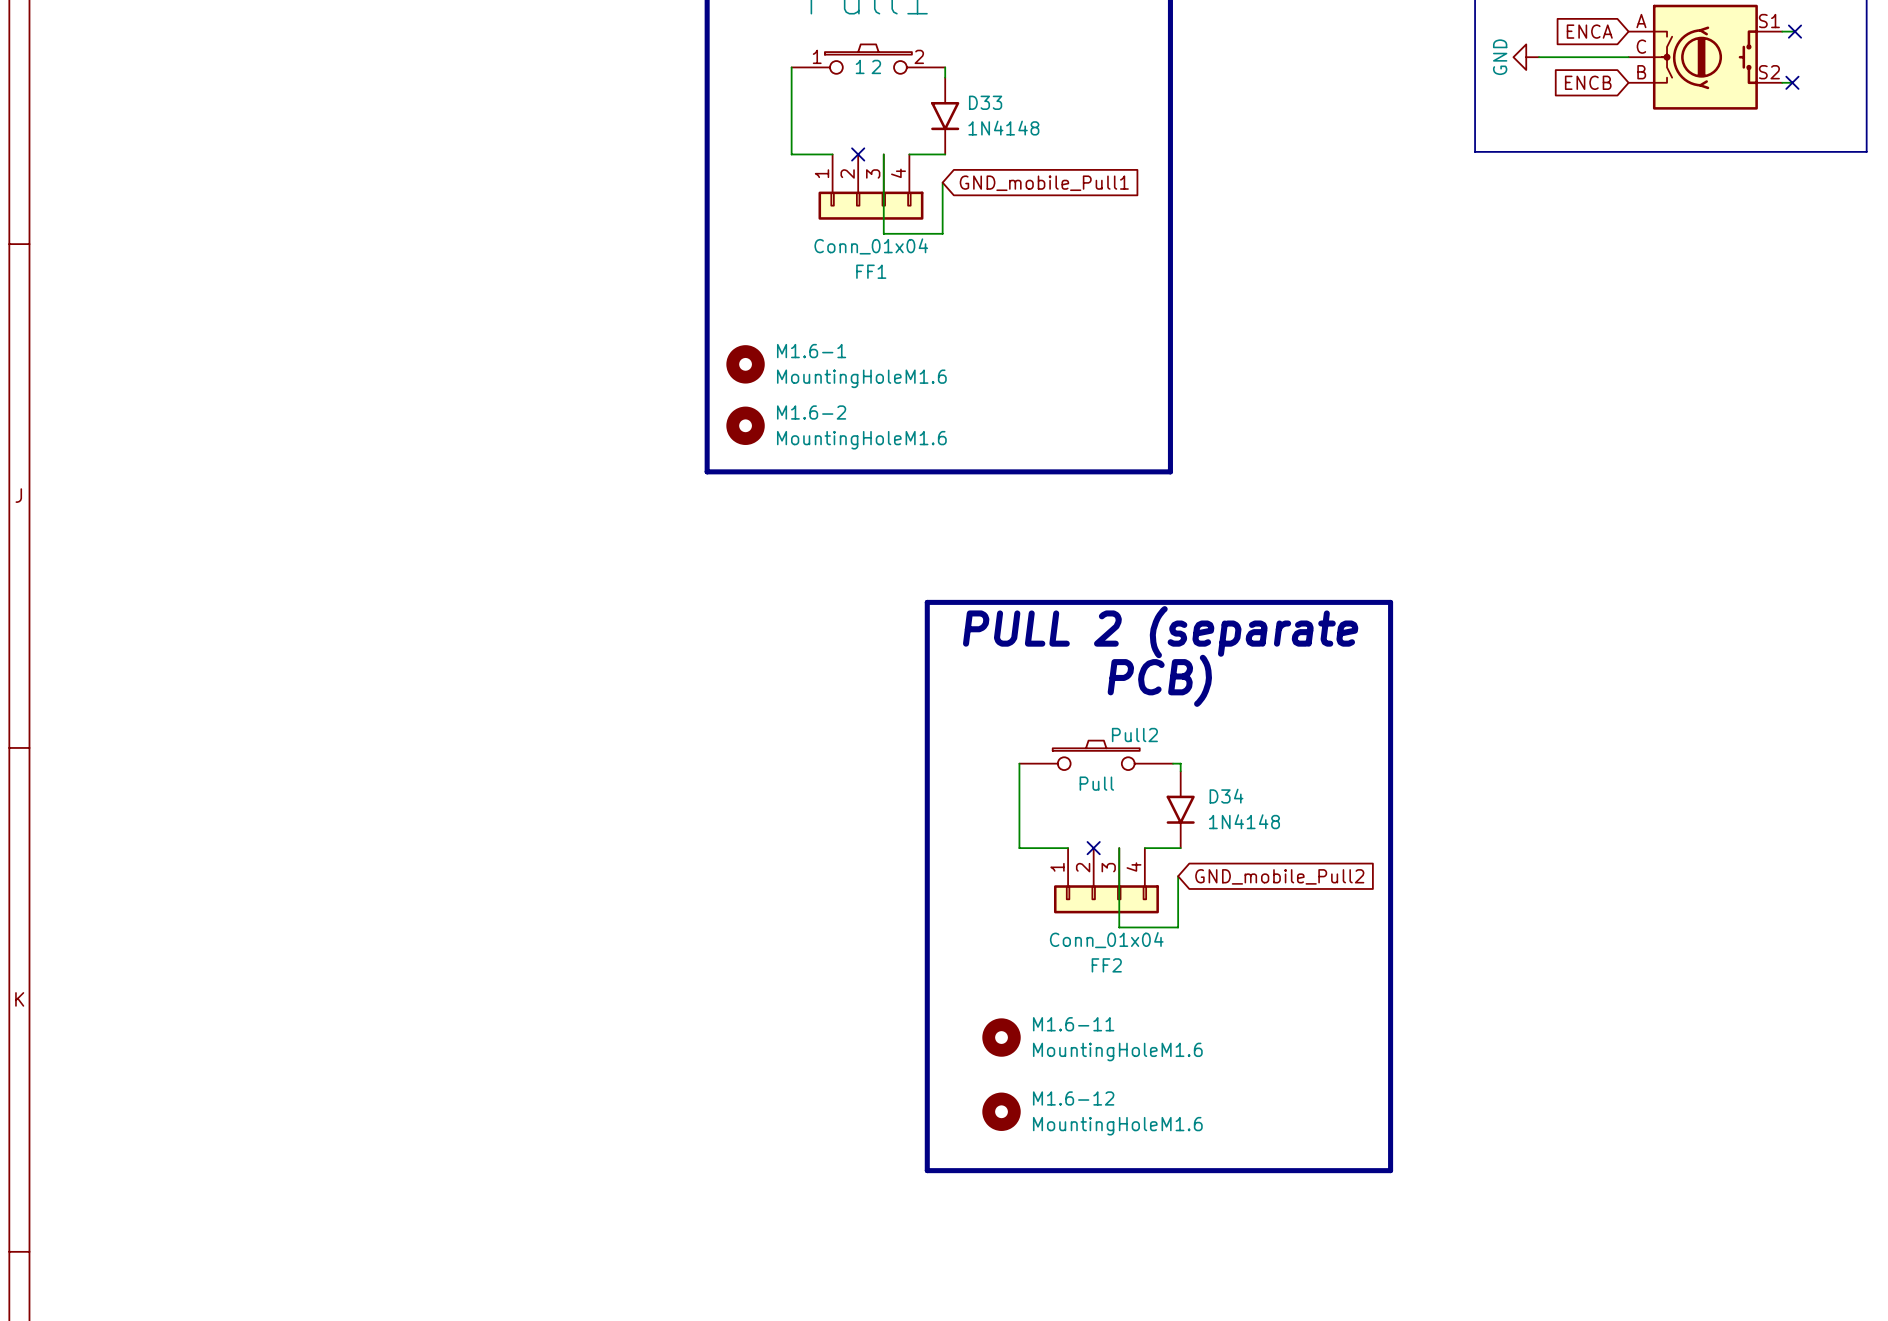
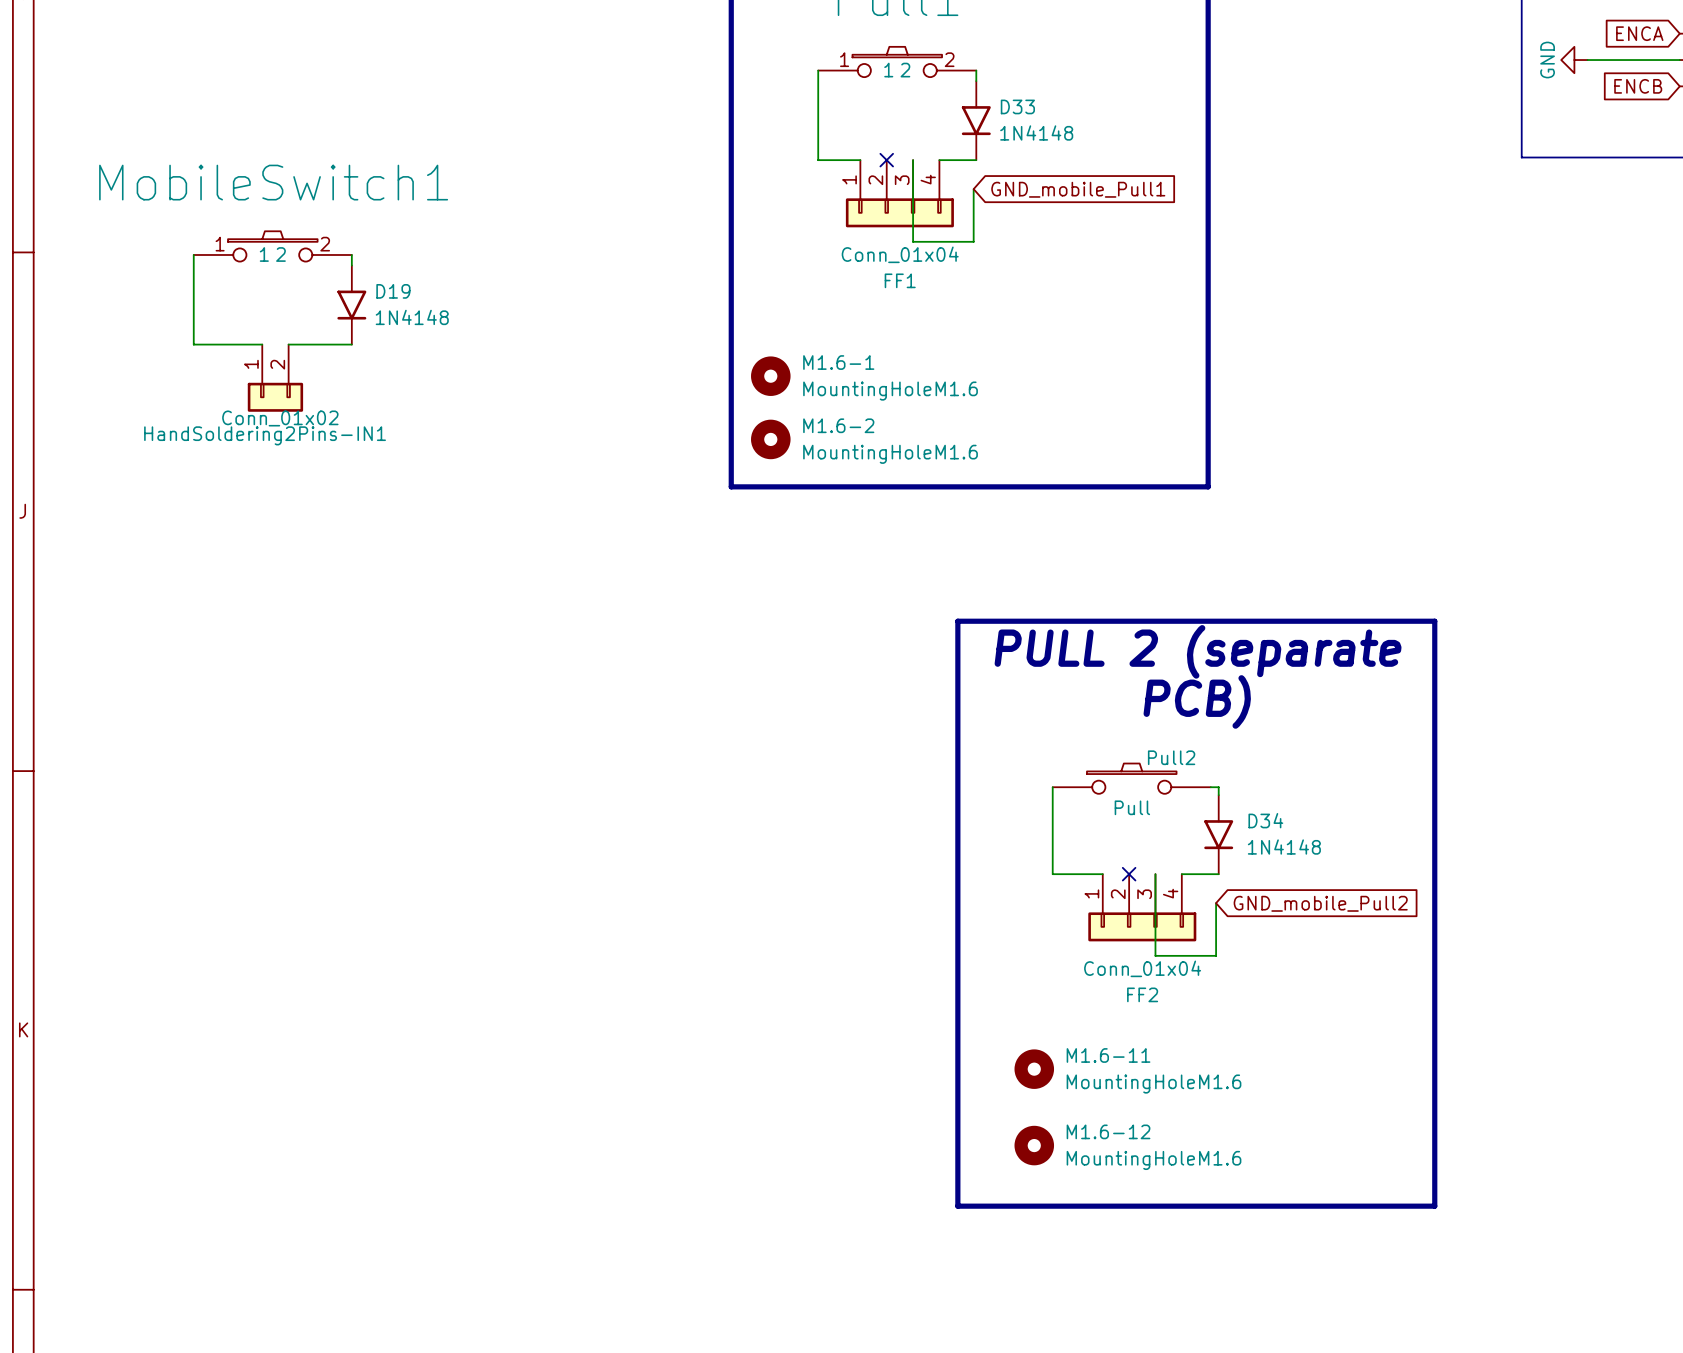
MobileSwitch1: none -> (272, 246)
wire: none -> (193, 254) (193, 344) (262, 344)
wire: none -> (351, 254) (351, 265)
D19: none -> 1N4148 (351, 305)
wire: none -> (288, 344) (351, 344)
HandSoldering2Pins-IN1: none -> Conn_01x02 (275, 378)

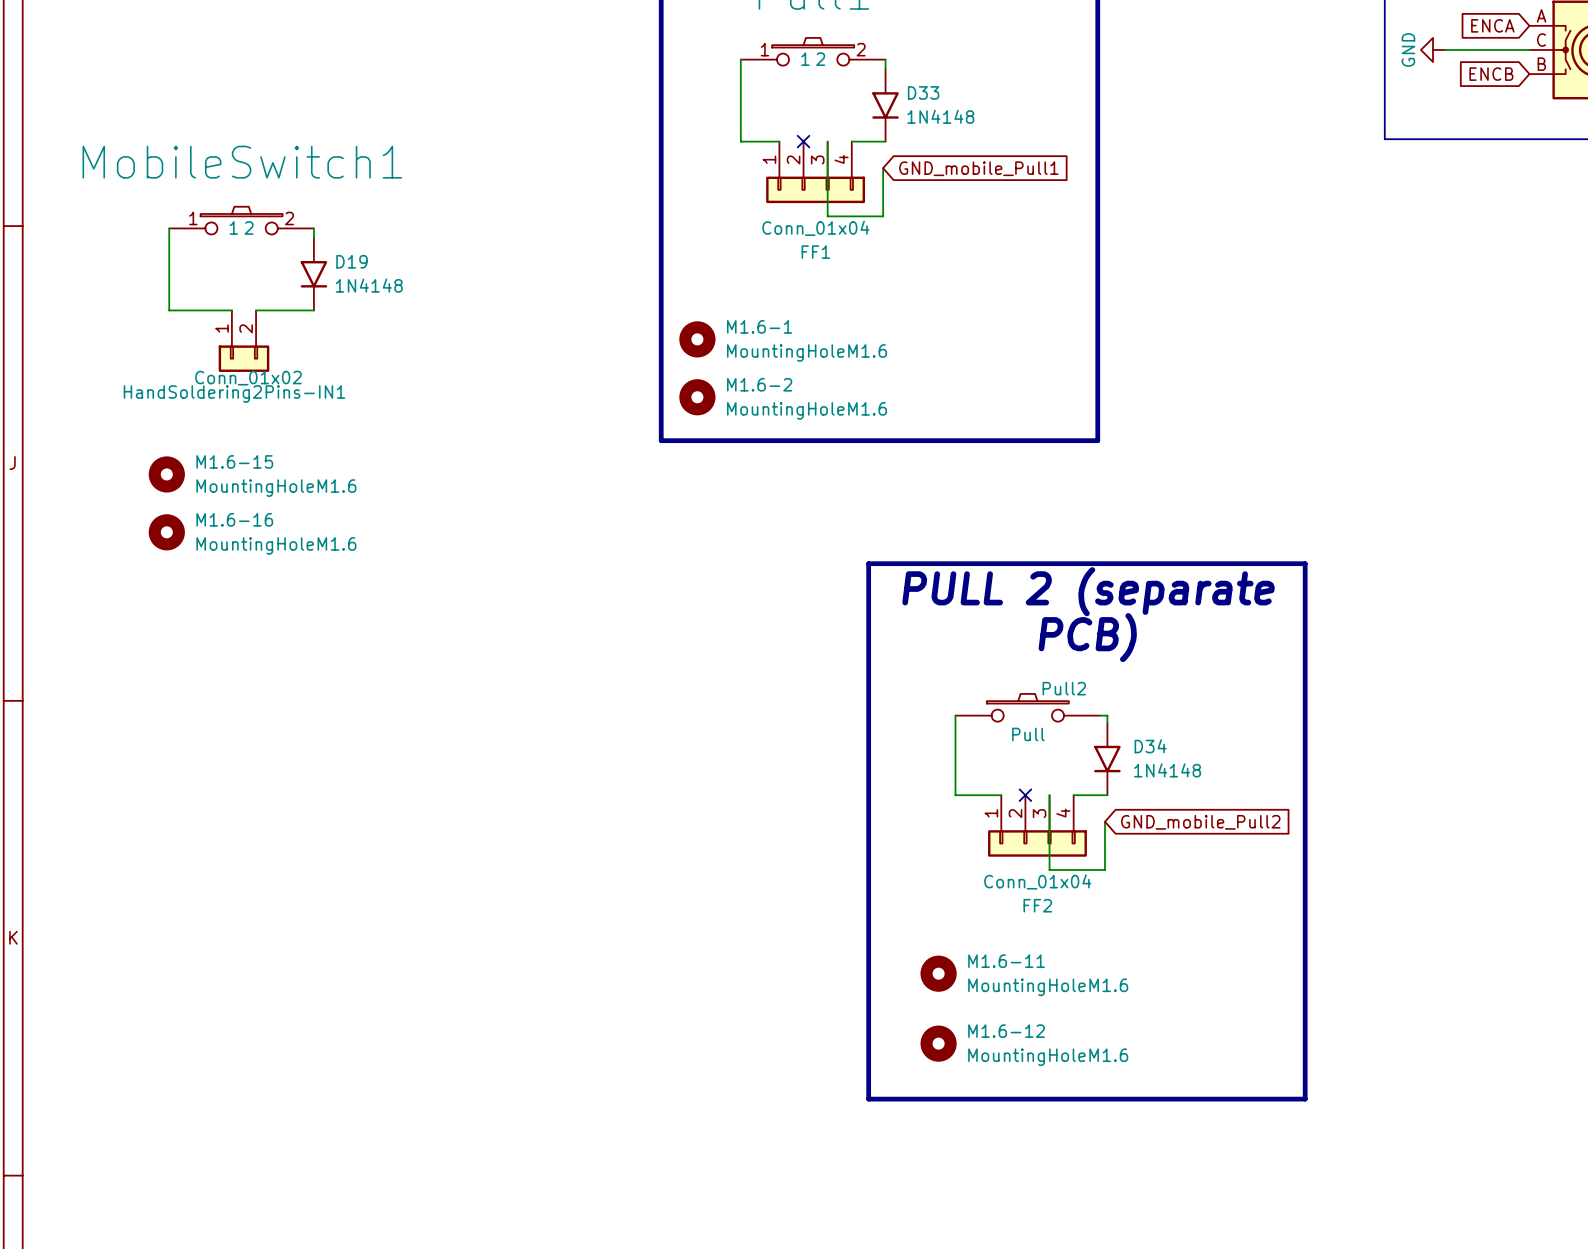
M1.6-15: none -> MountingHoleM1.6 (166, 474)
M1.6-16: none -> MountingHoleM1.6 (166, 532)

